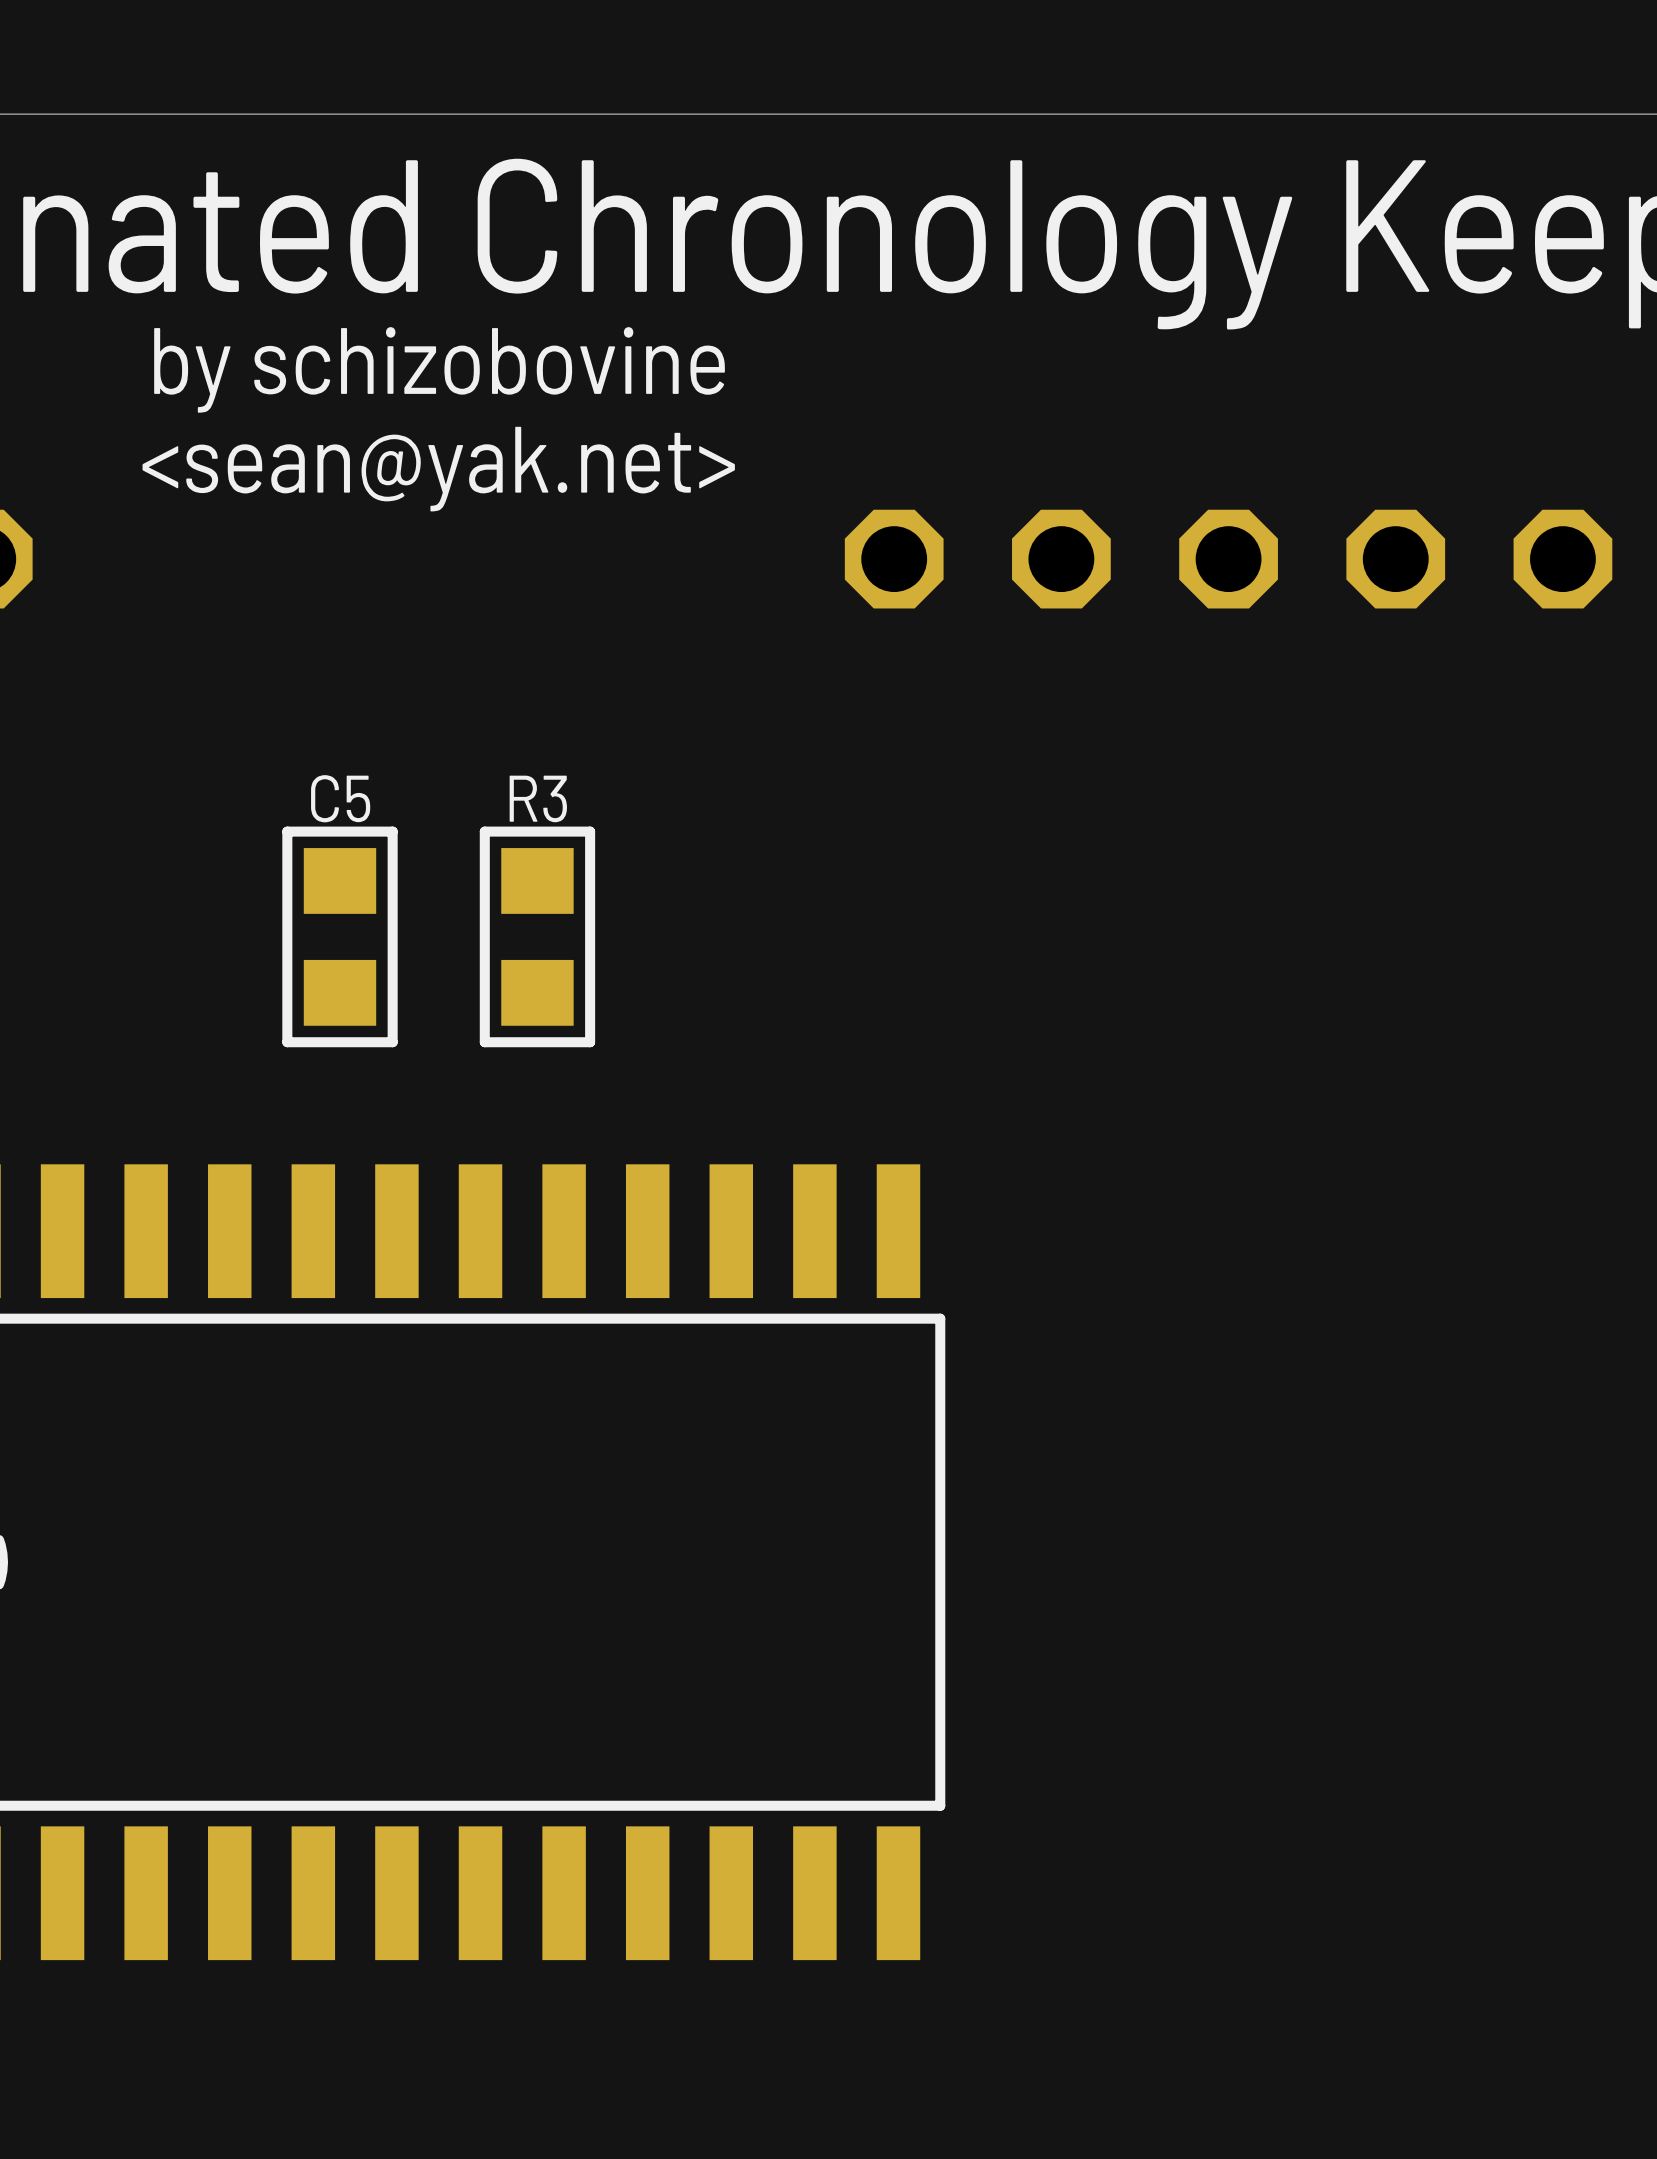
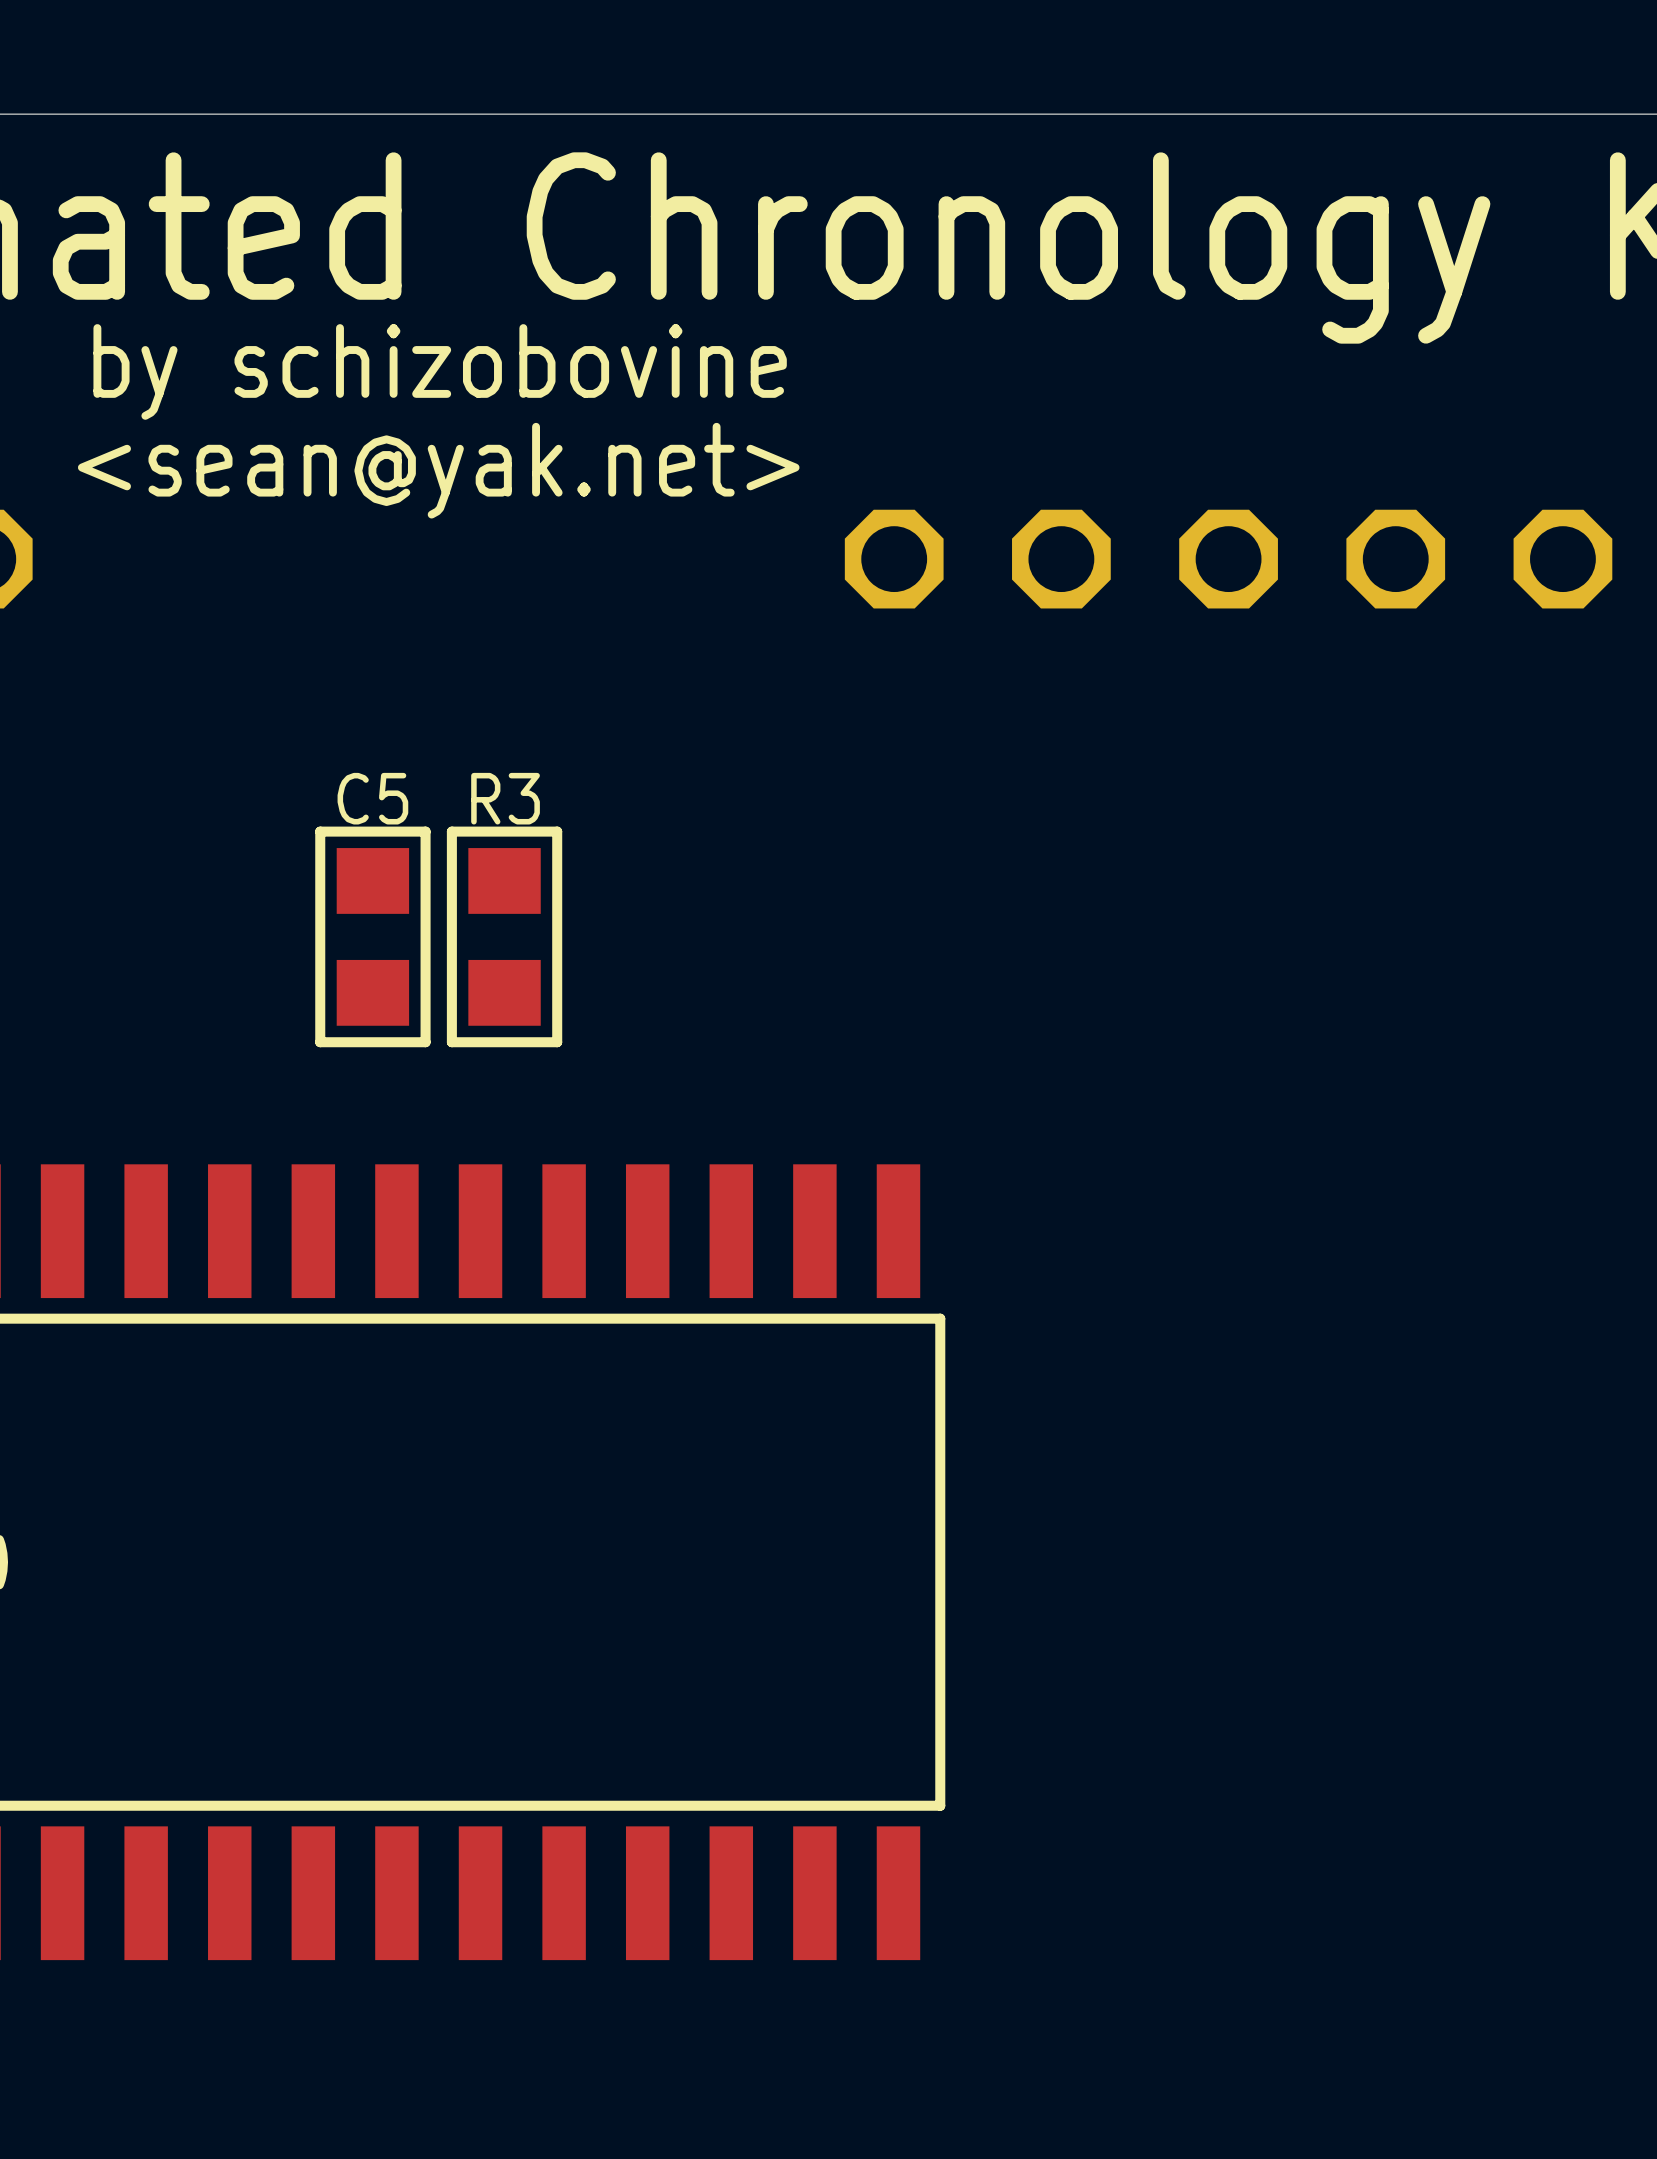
C5 position: (339, 936) -> (372, 936)
R3 position: (537, 936) -> (504, 936)

